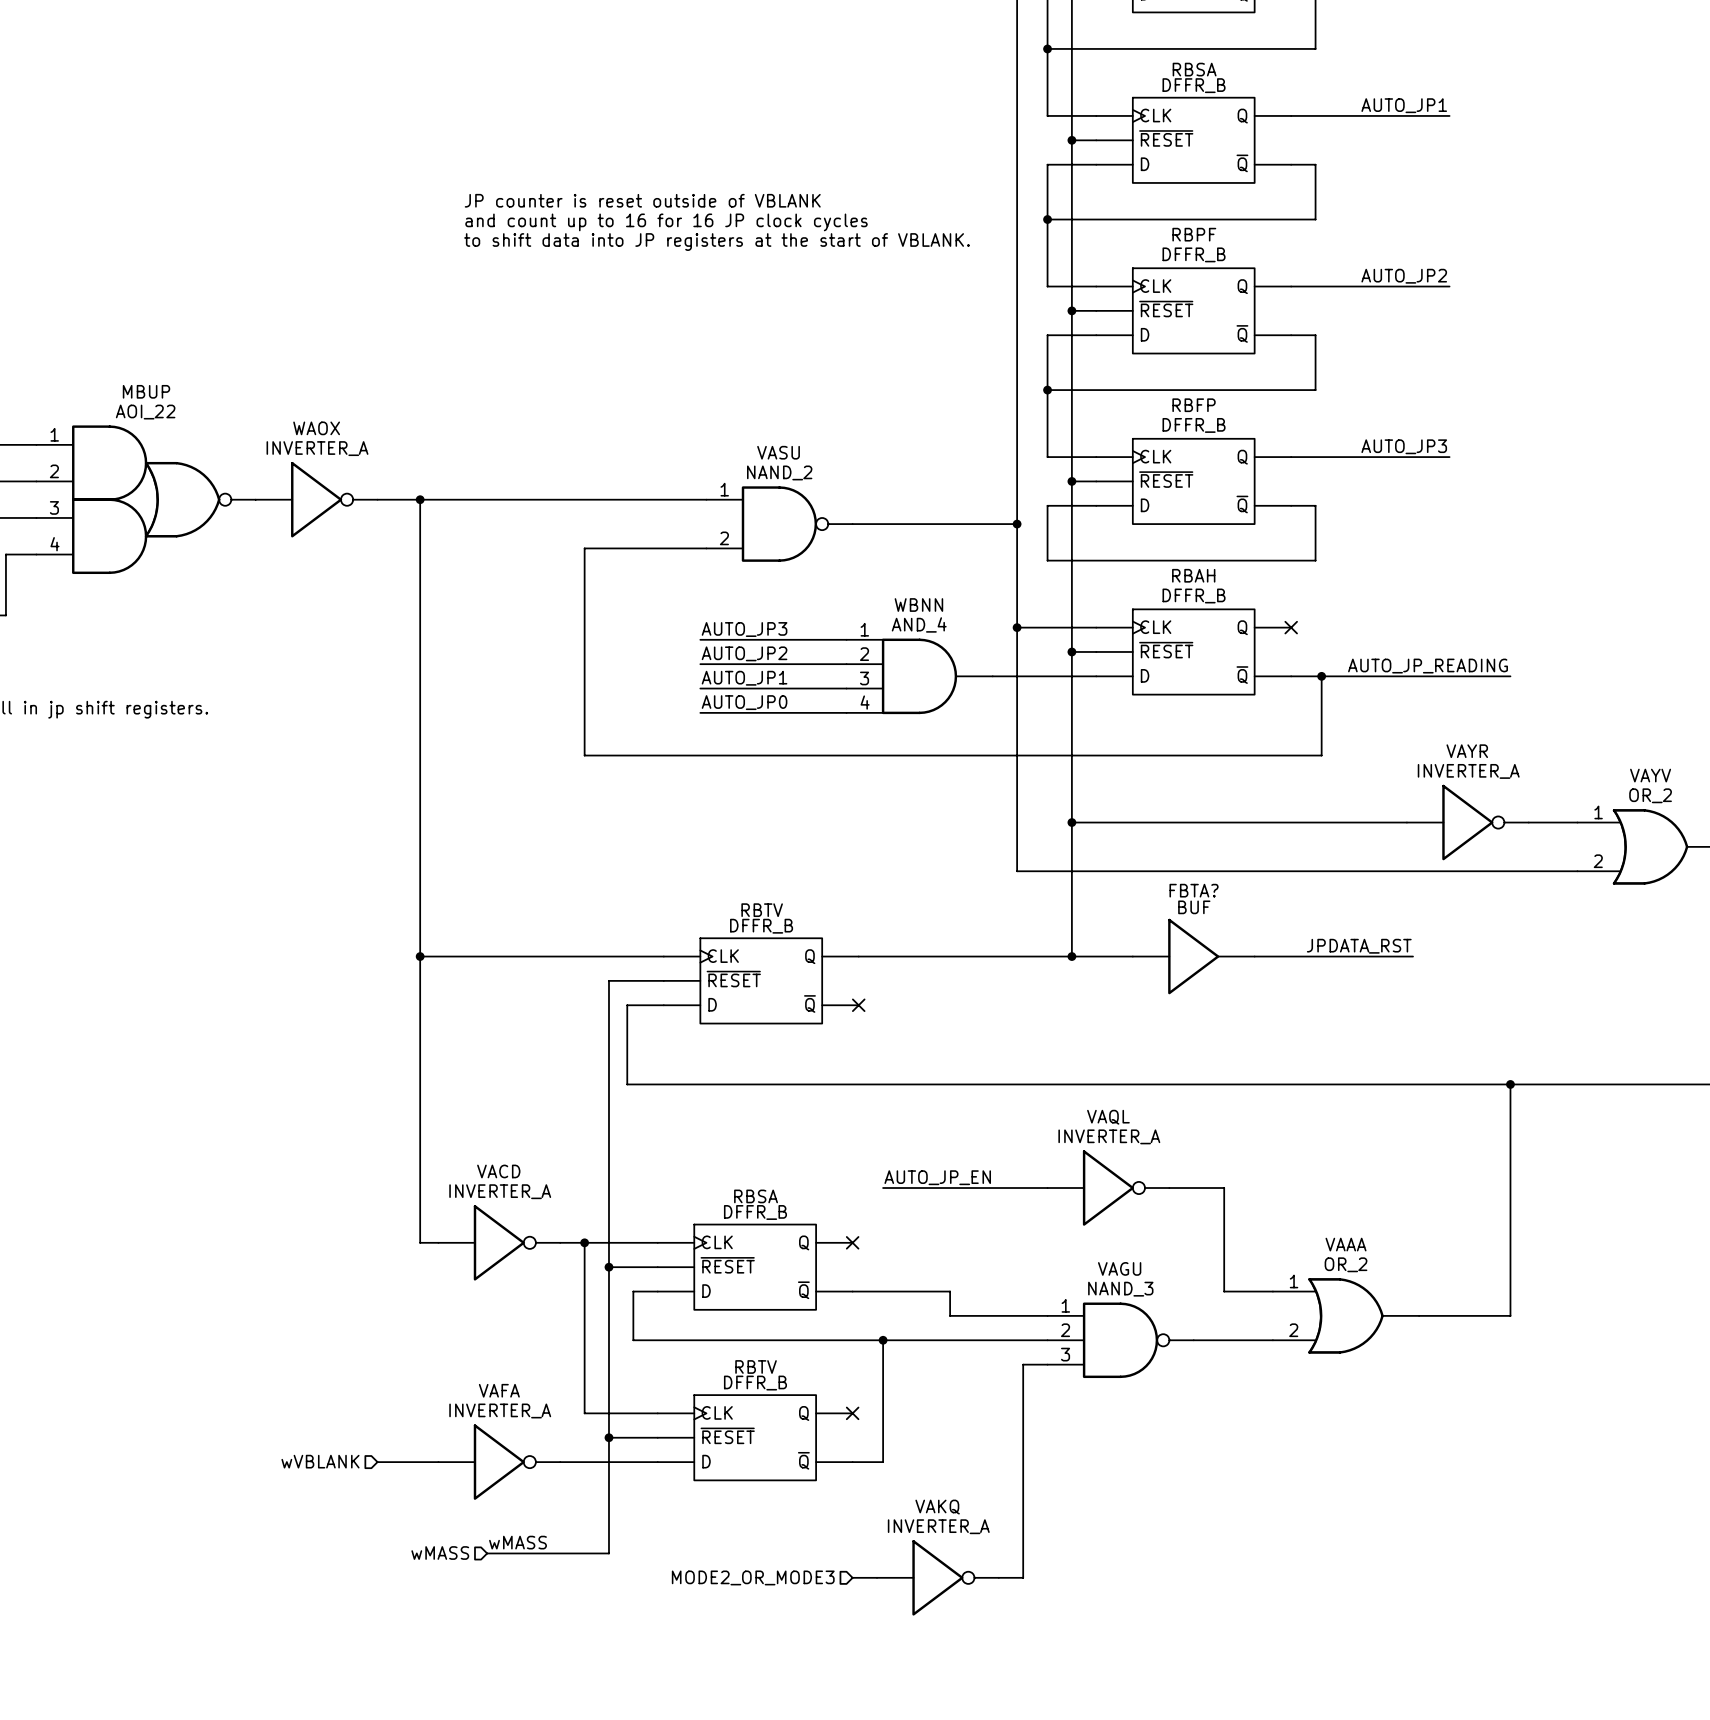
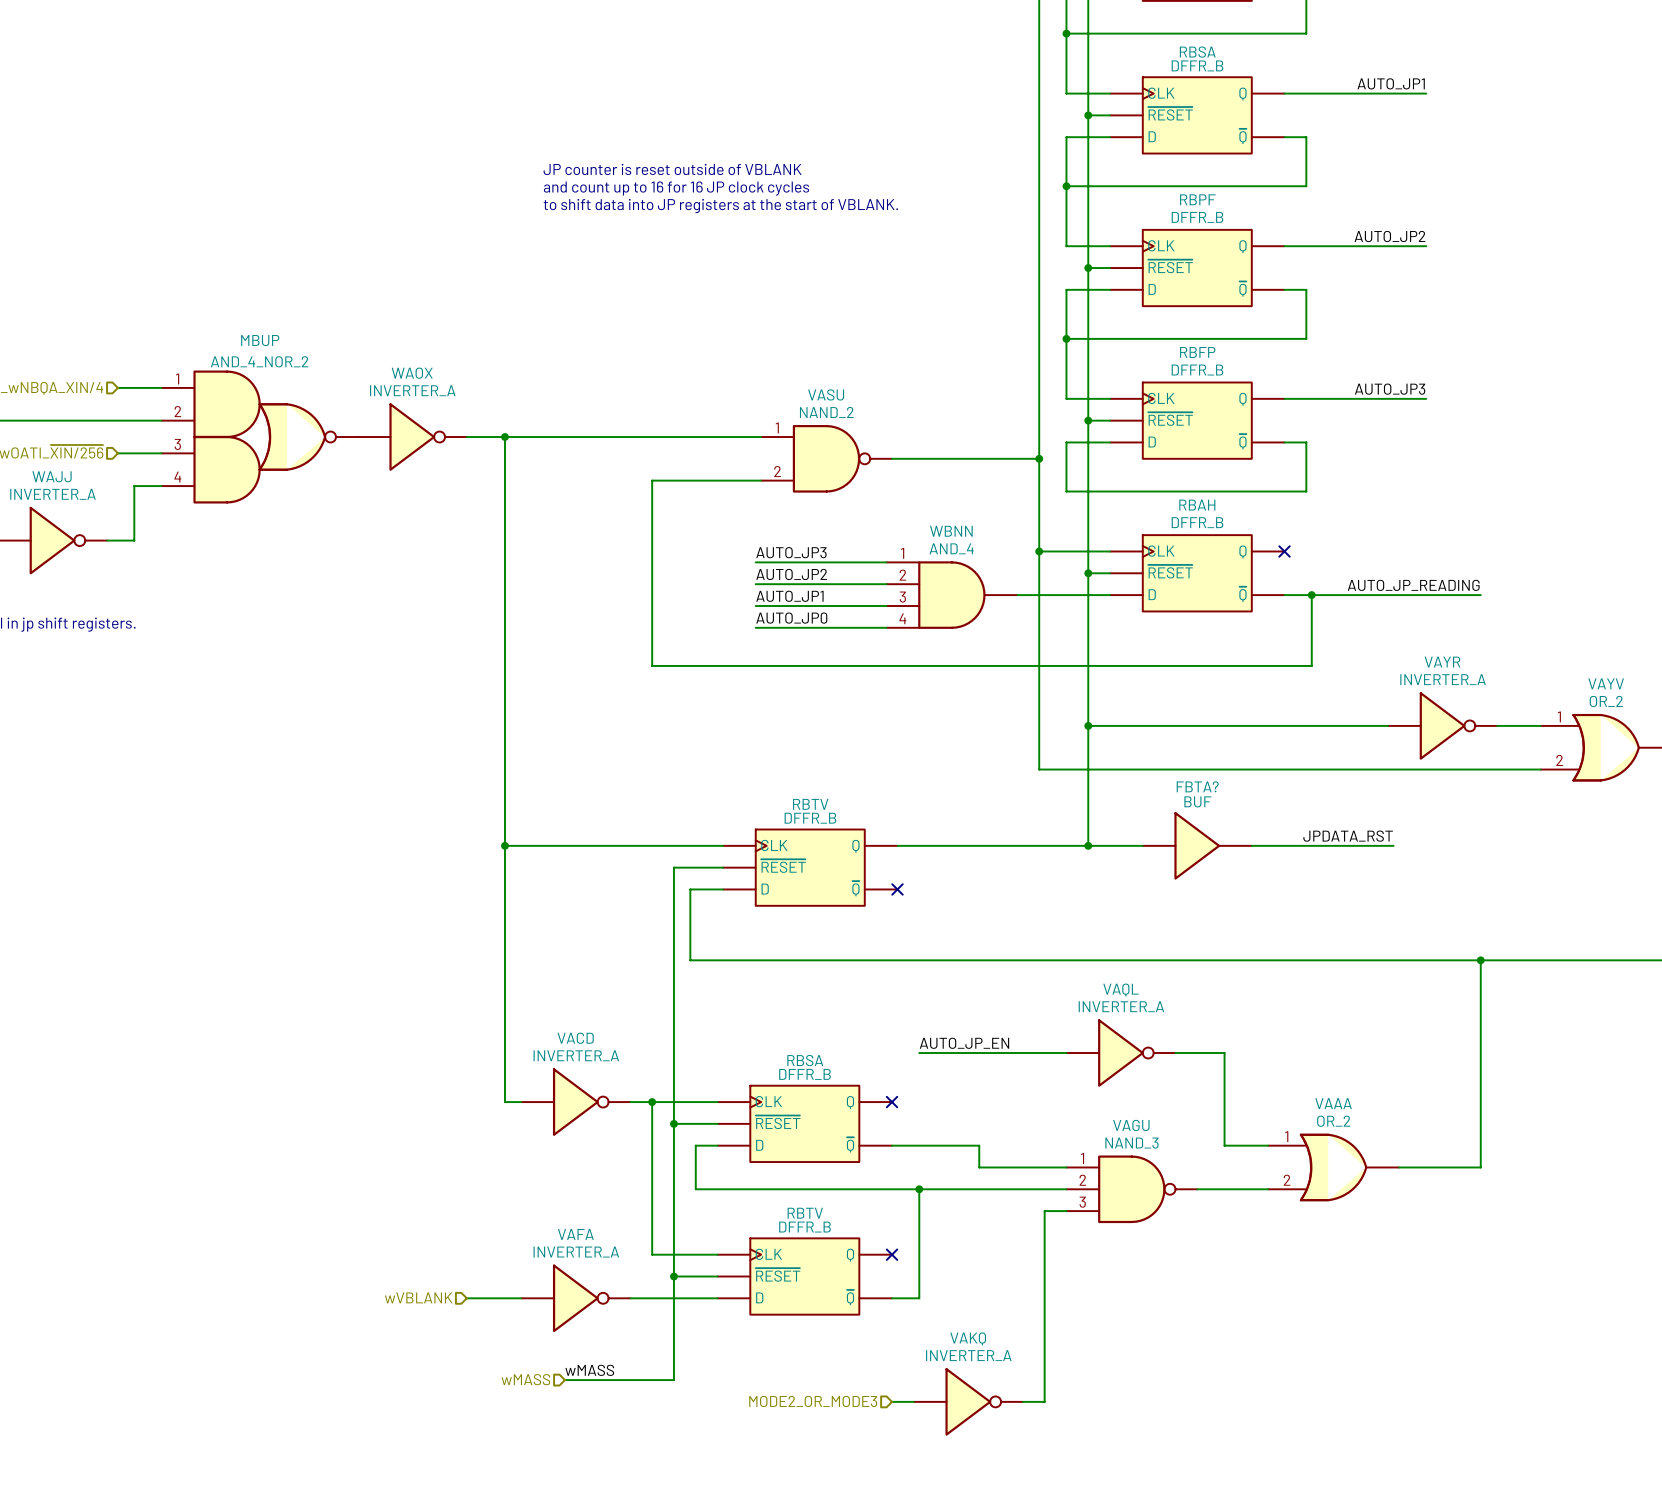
MBUP value: AOI_22 (145, 412) -> AND_4_NOR_2 (259, 361)

